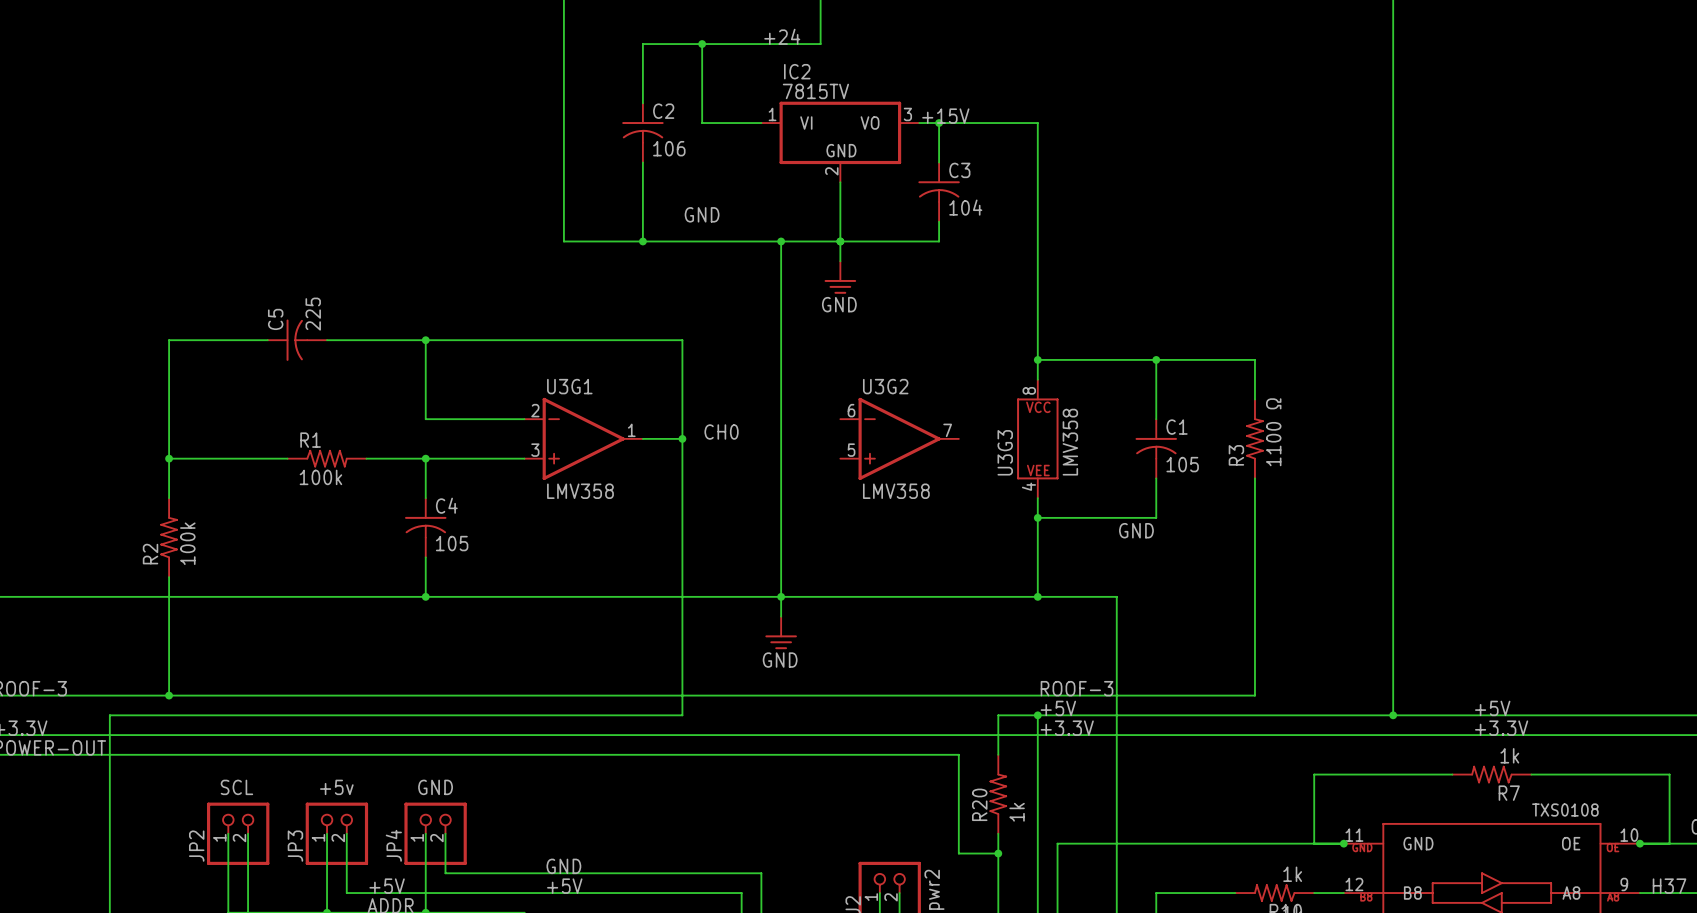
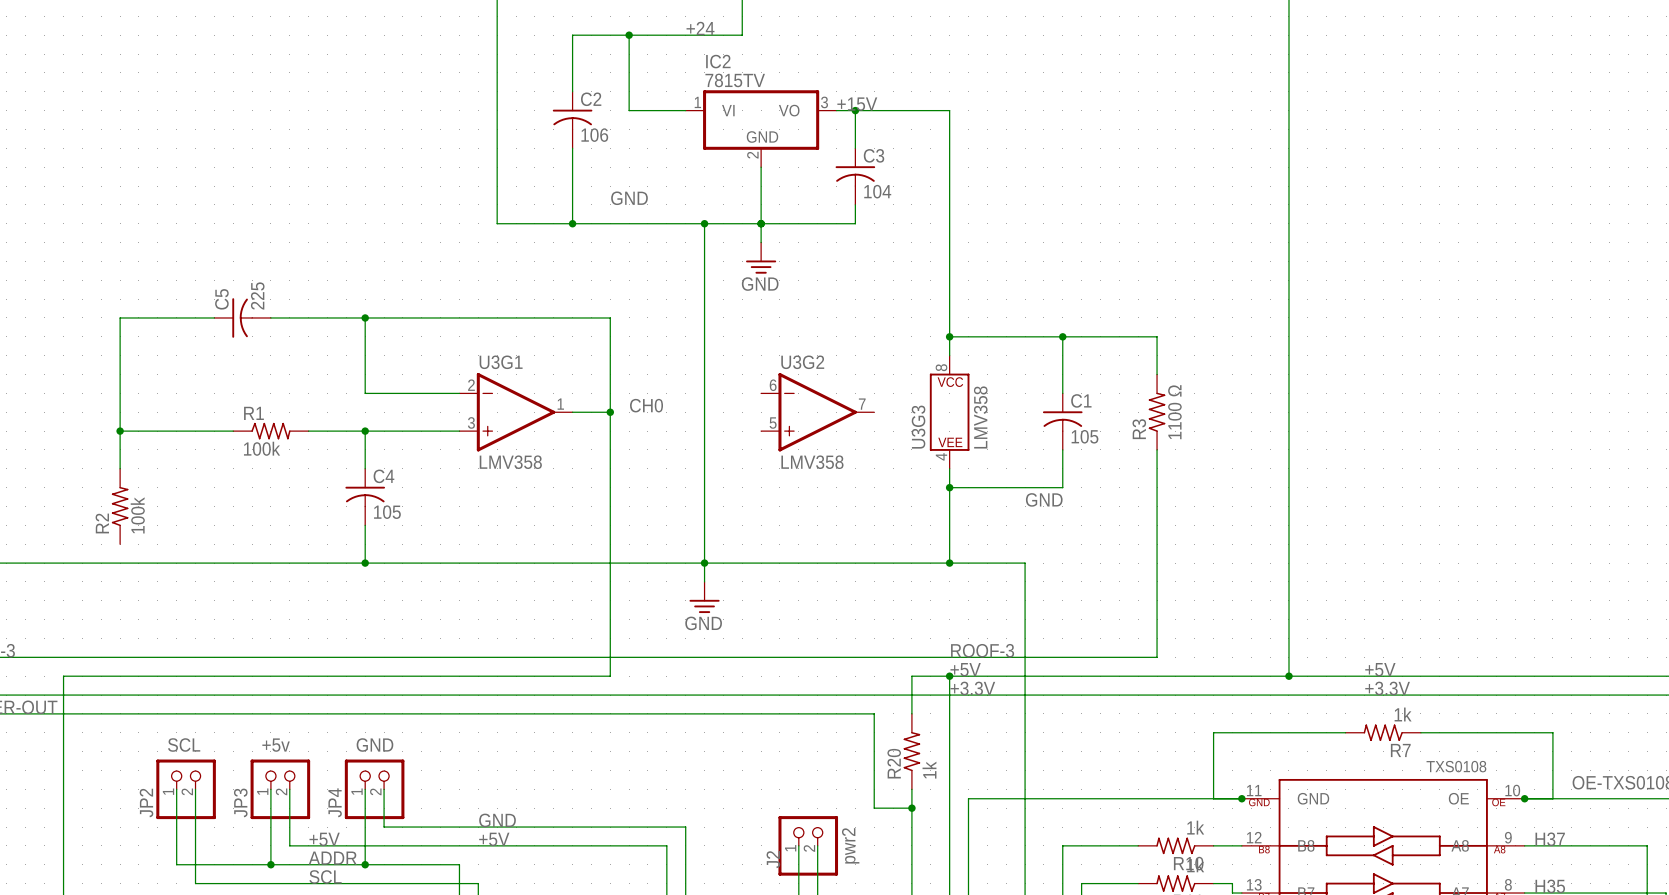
wire: (169, 577) (169, 695) -> none
junction: (169, 695) -> none

